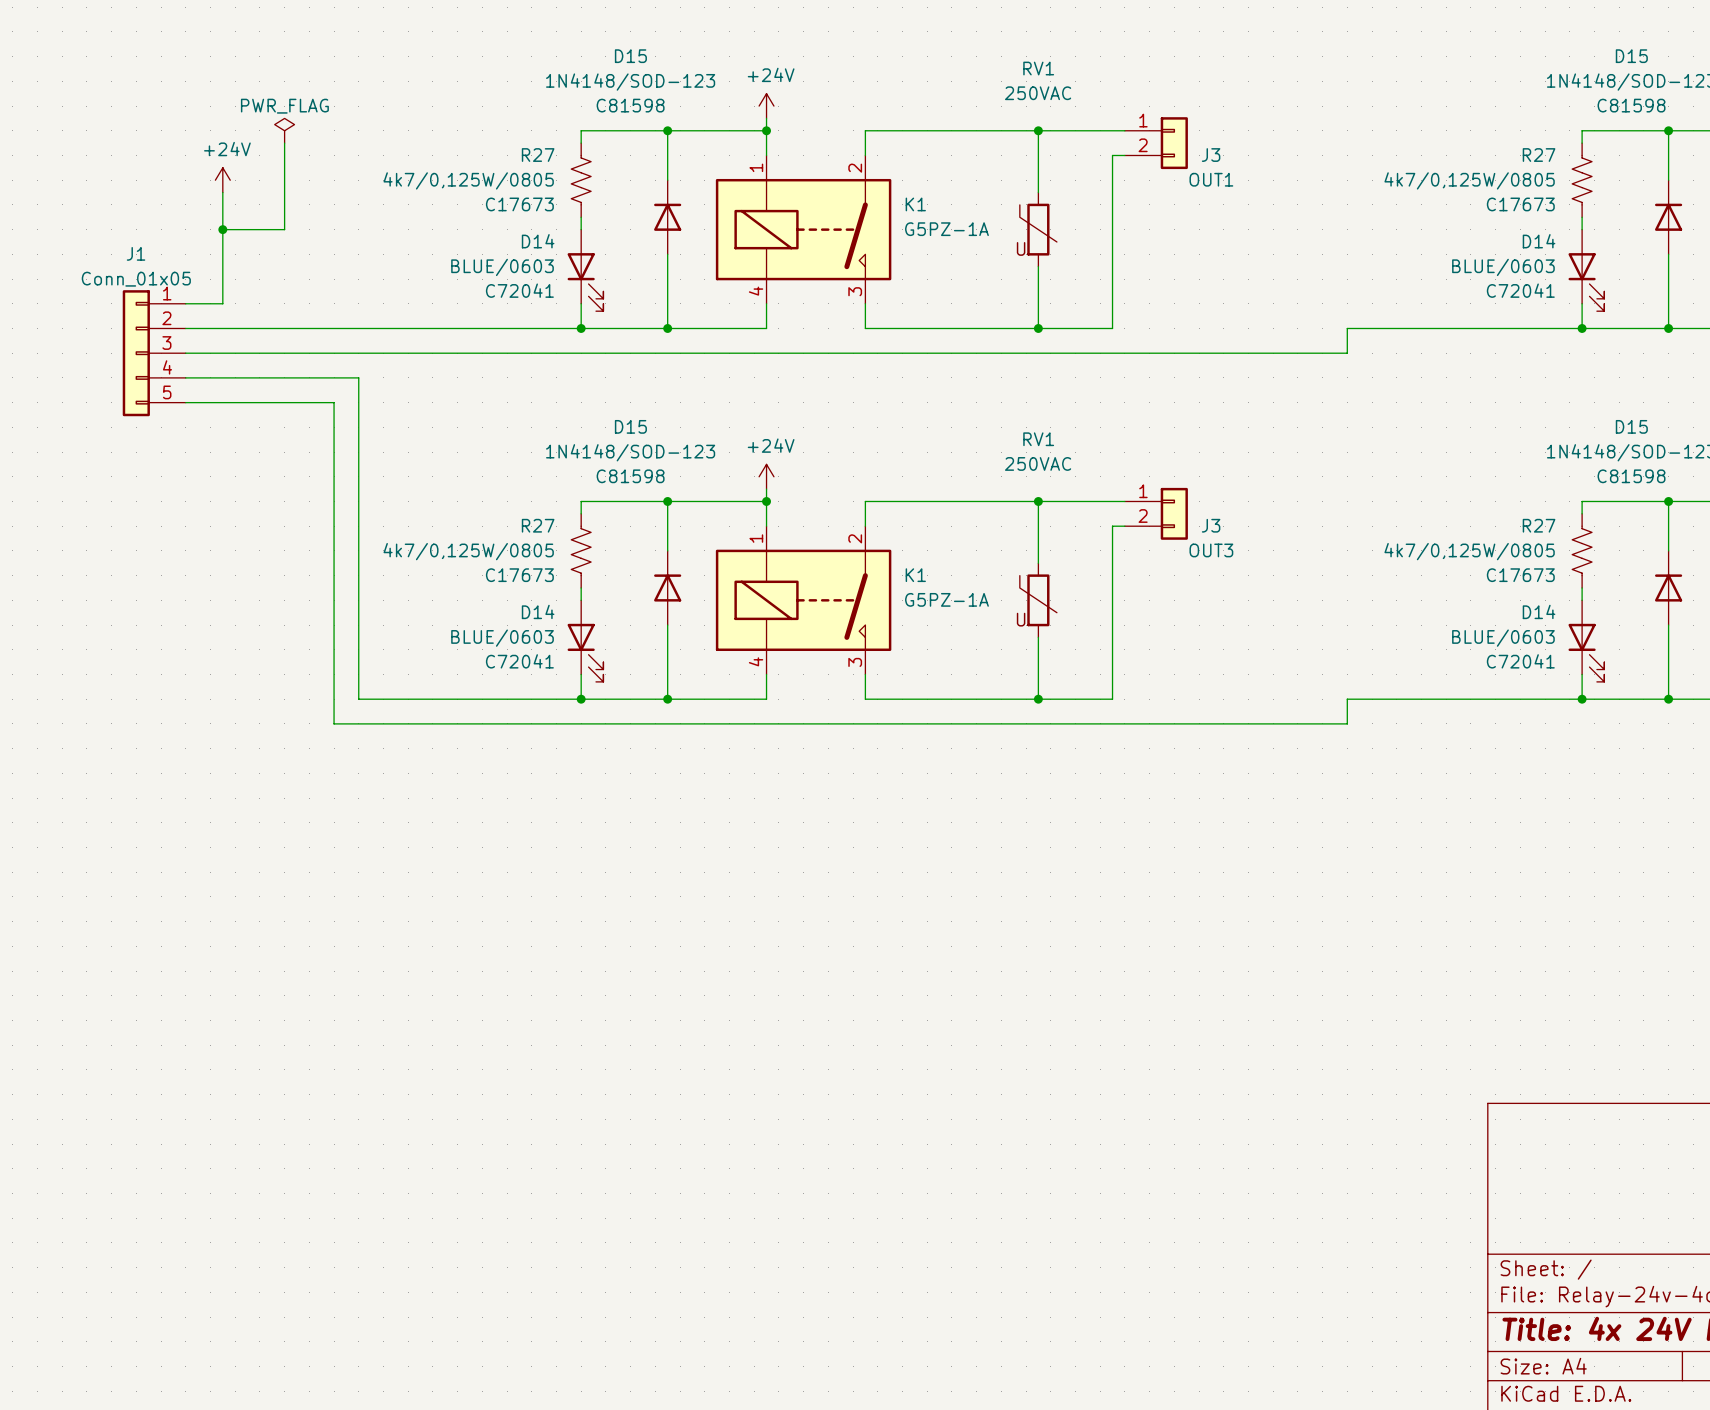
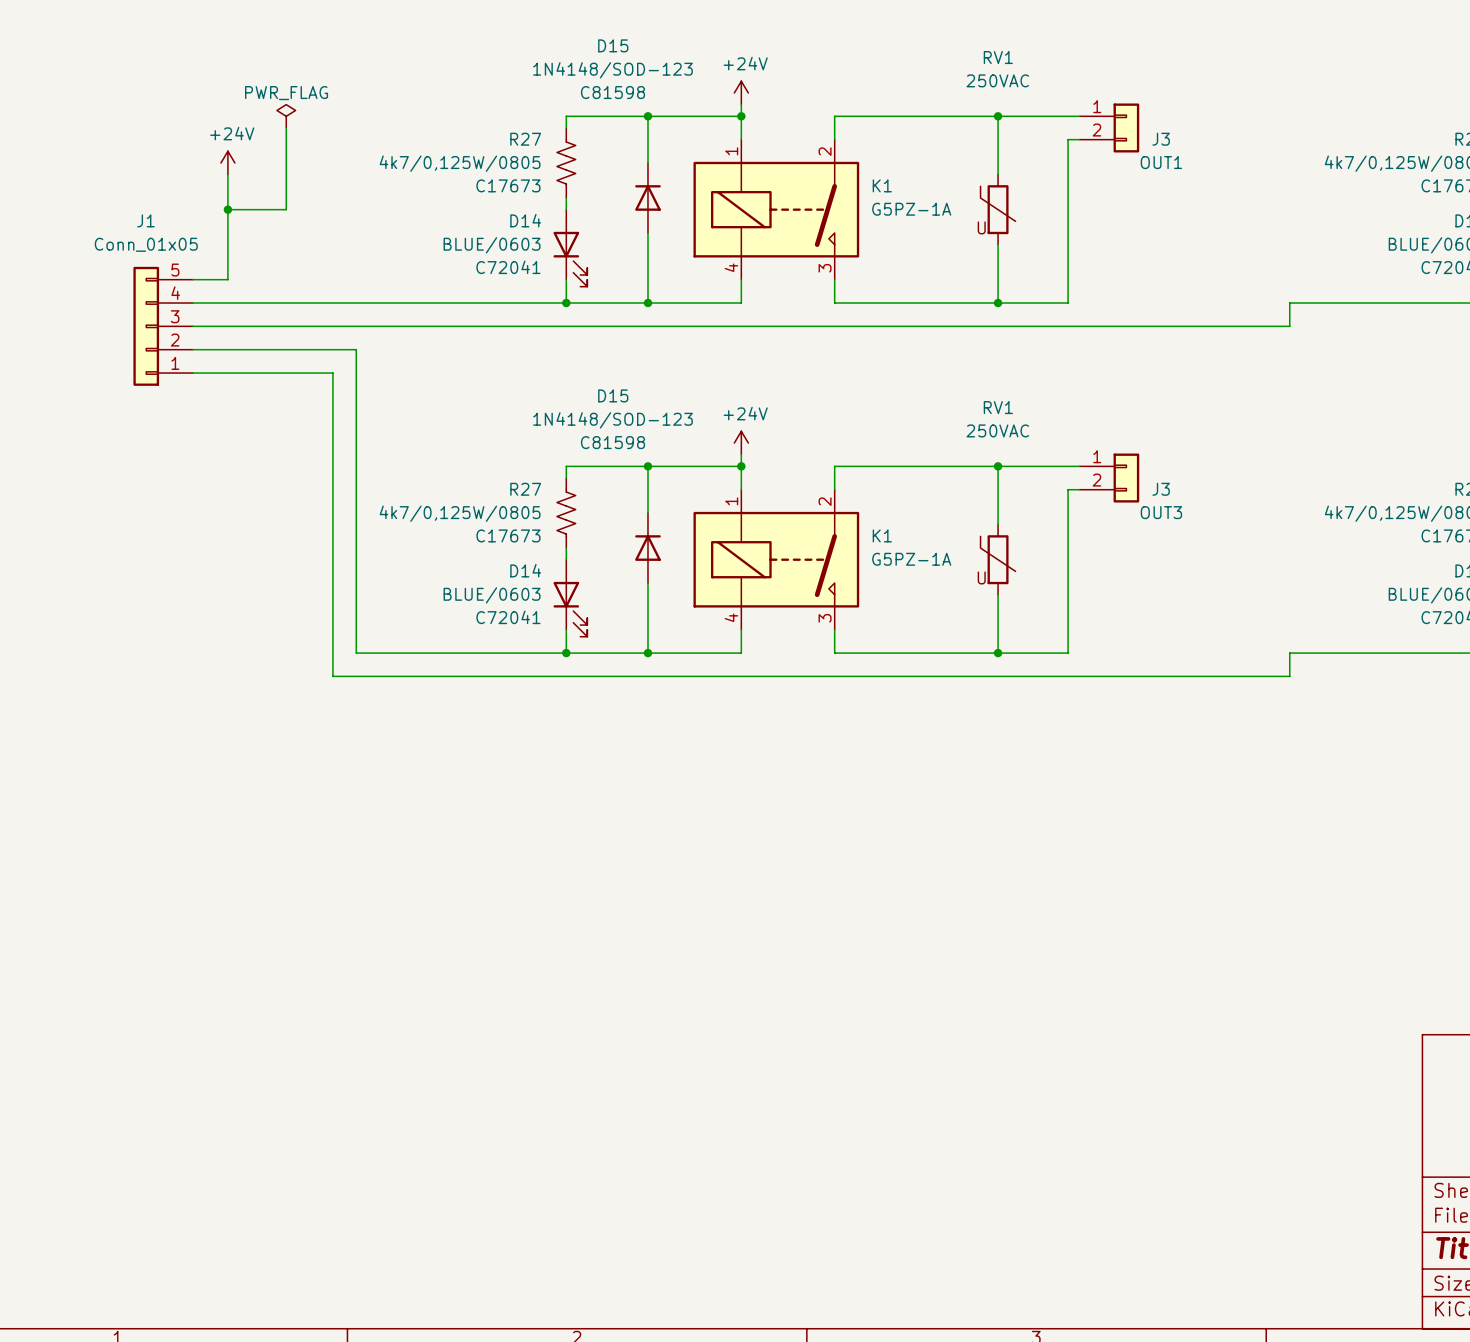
J1 flip: as is (136, 353) -> up-down (146, 326)

